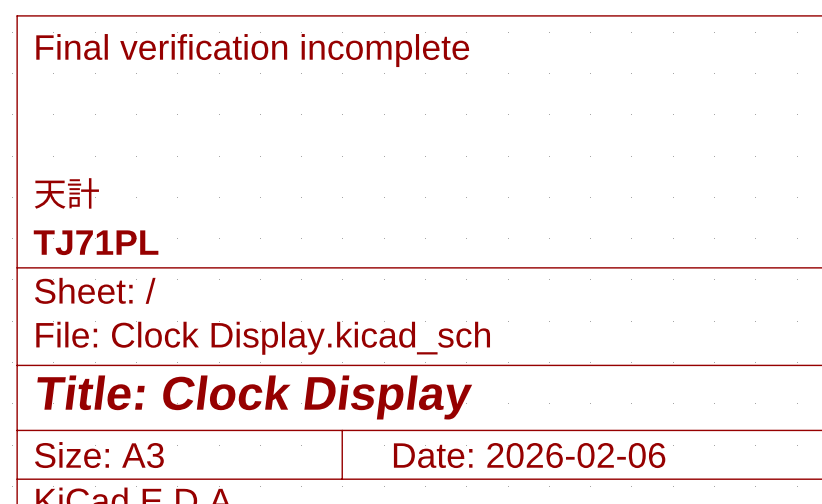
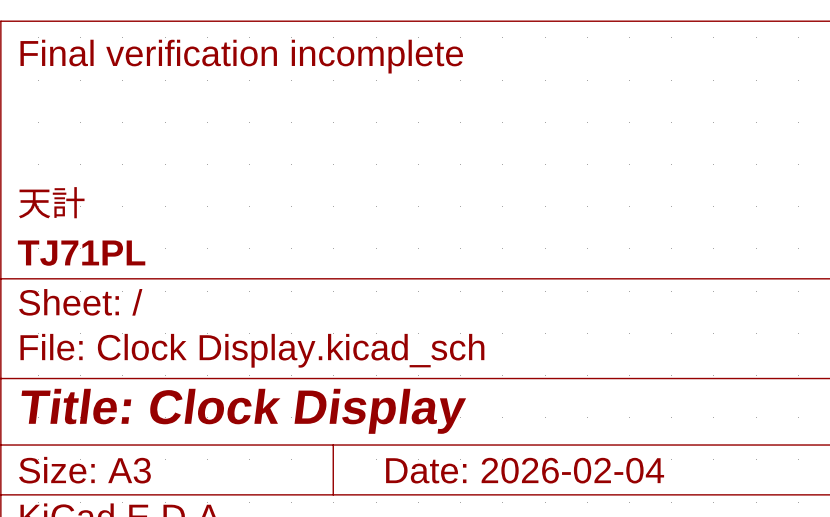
title block: Date: 2026-02-06 (529, 455) -> Date: 2026-02-04 (525, 470)

